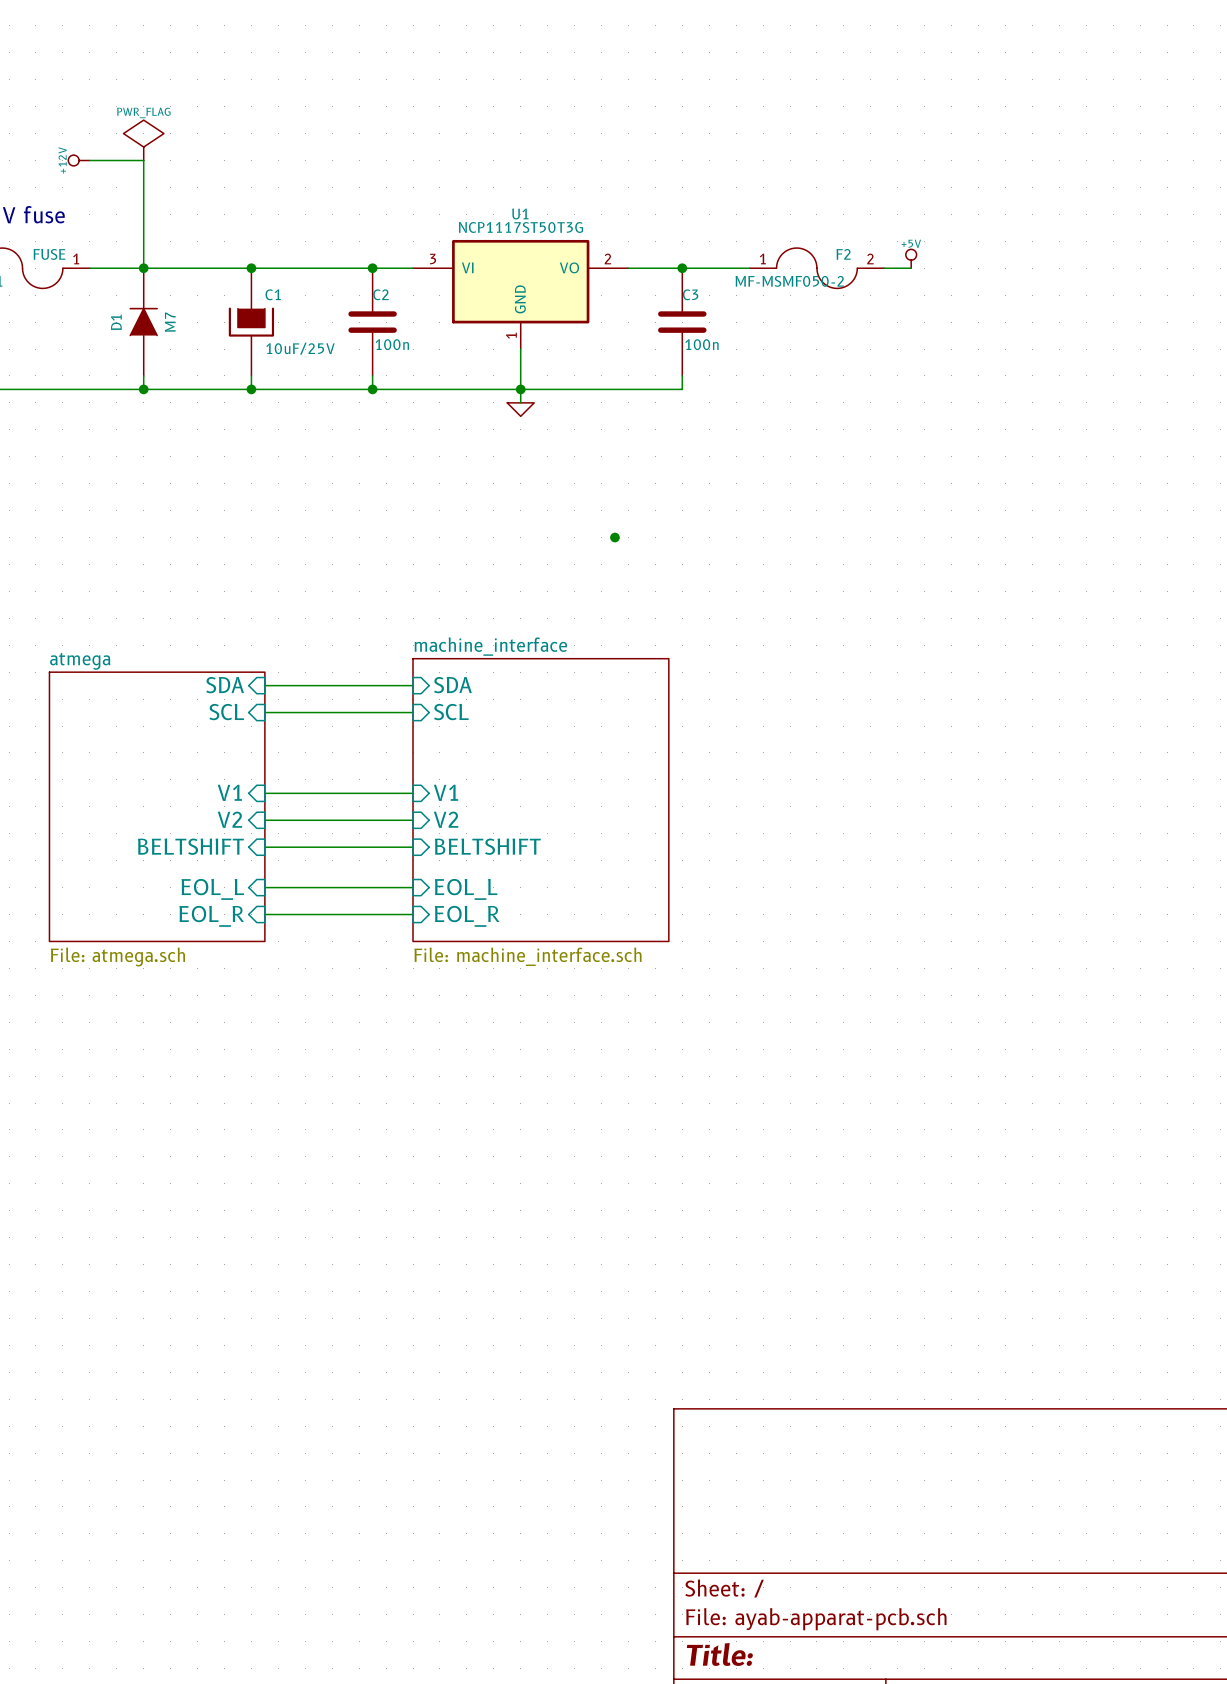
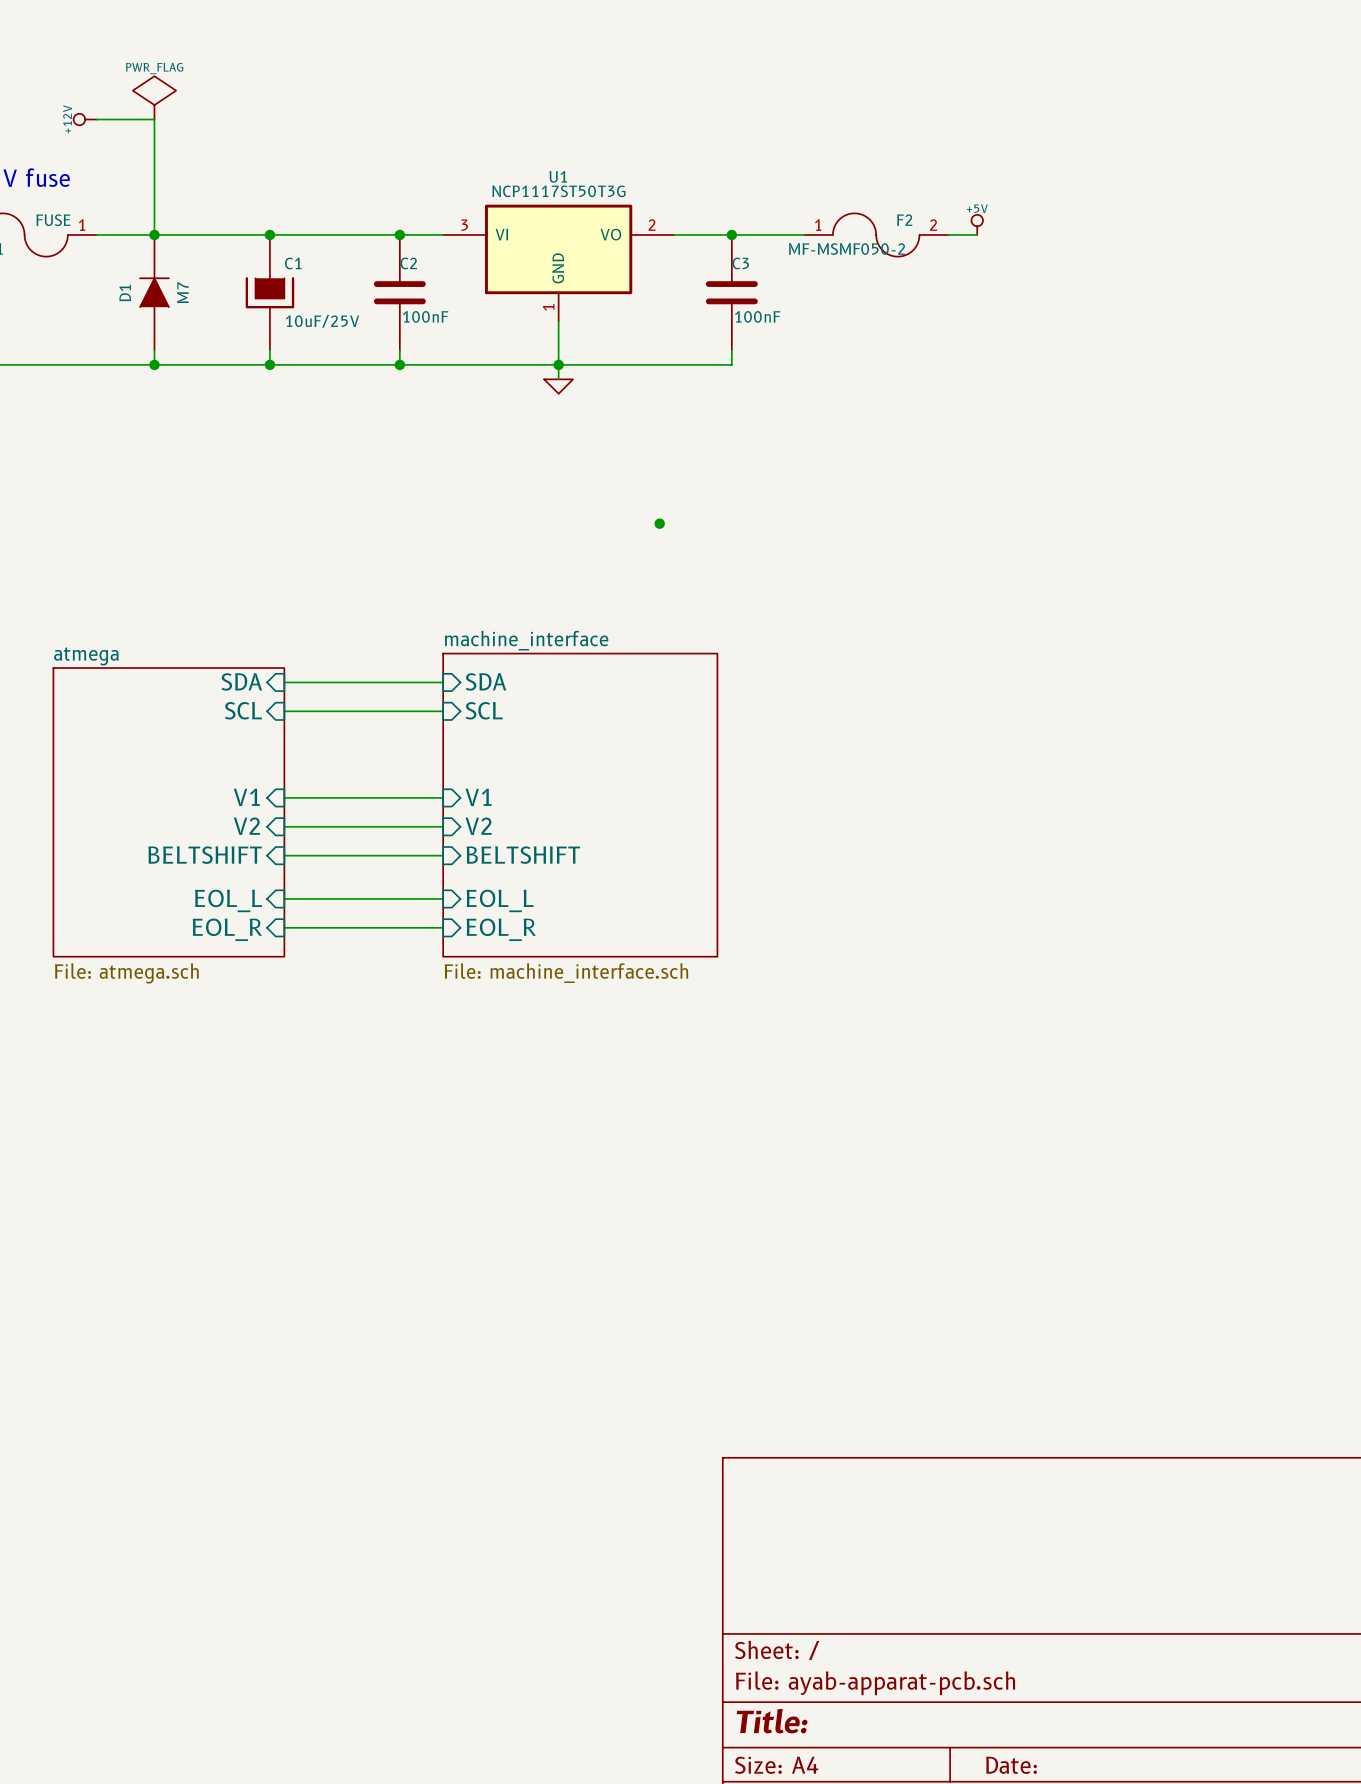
C2 value: 100n (392, 344) -> 100nF (425, 316)
C3 value: 100n (701, 344) -> 100nF (757, 316)

